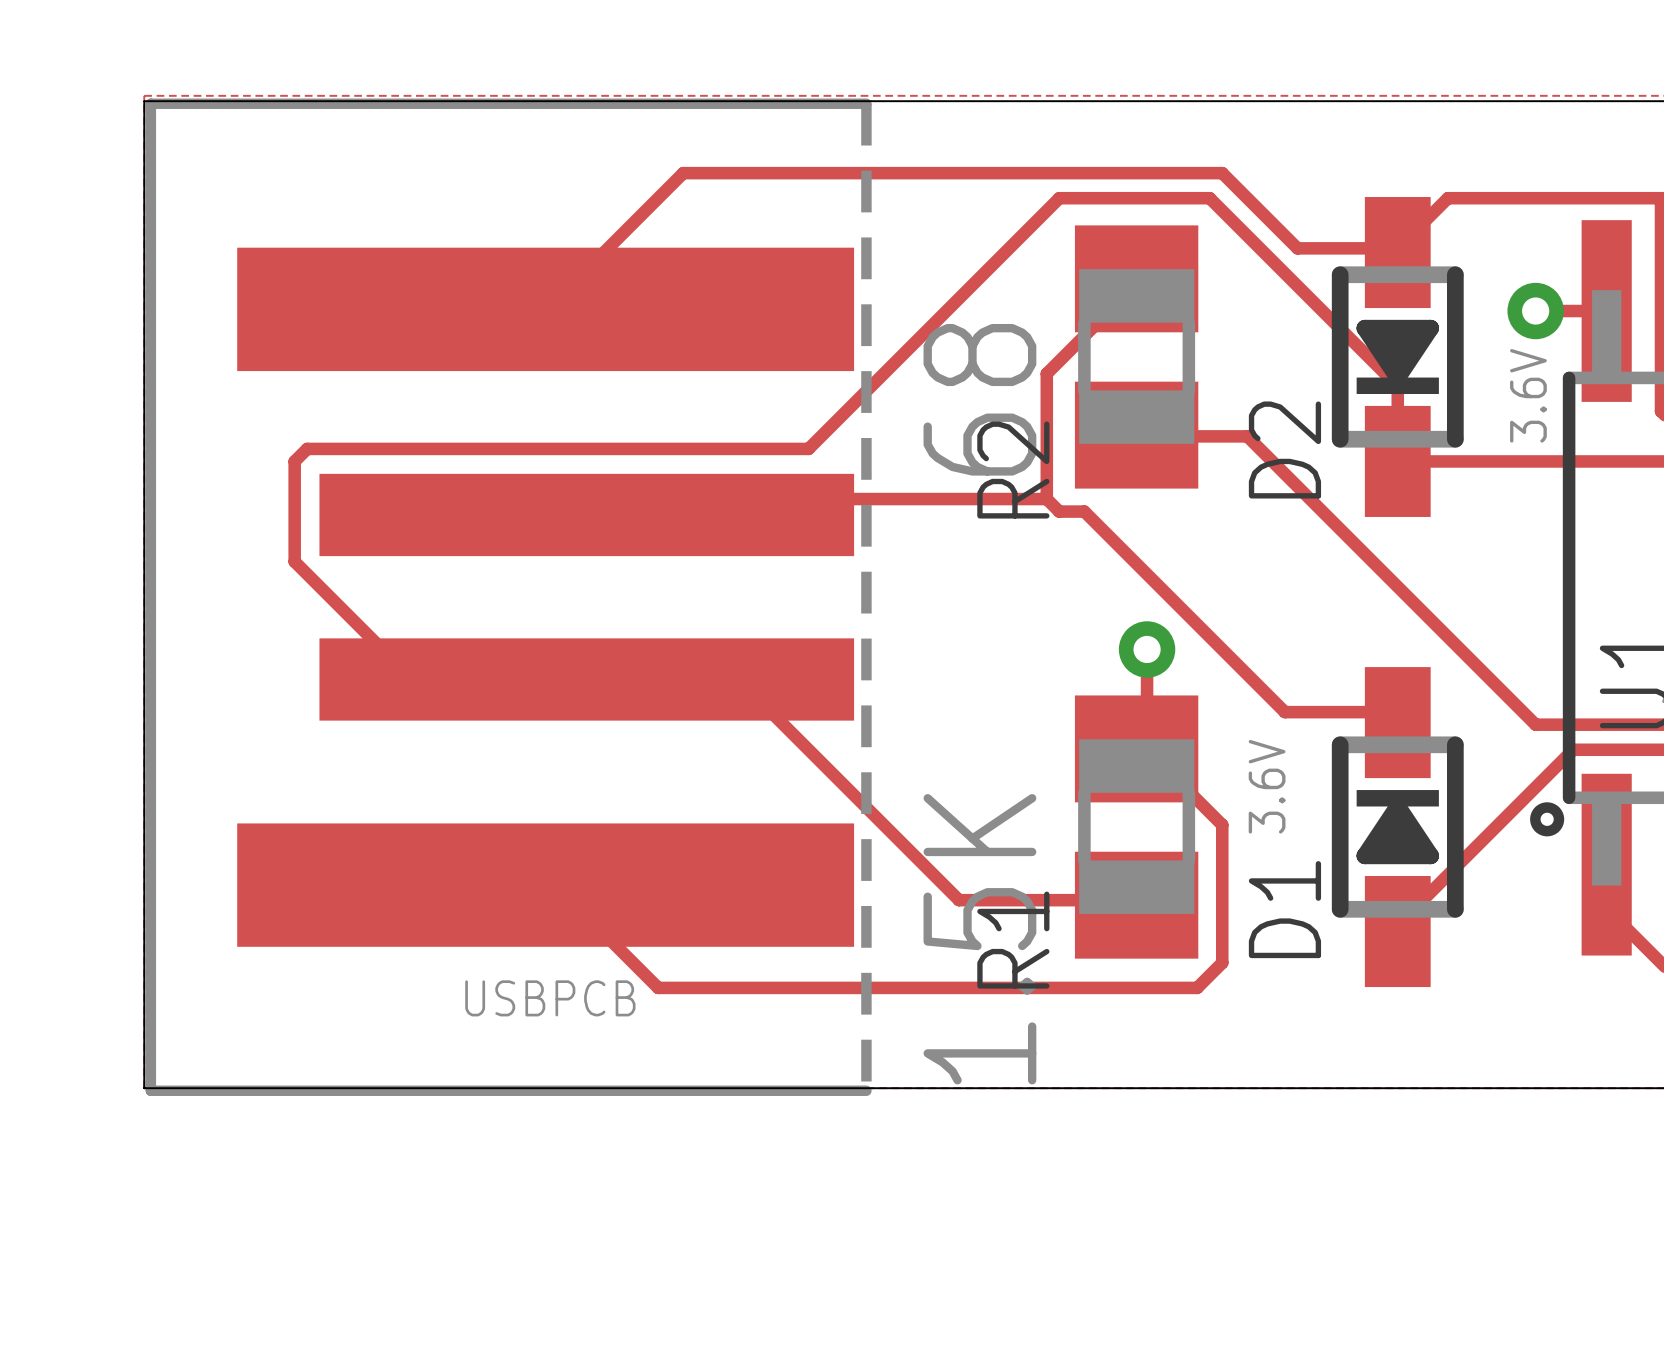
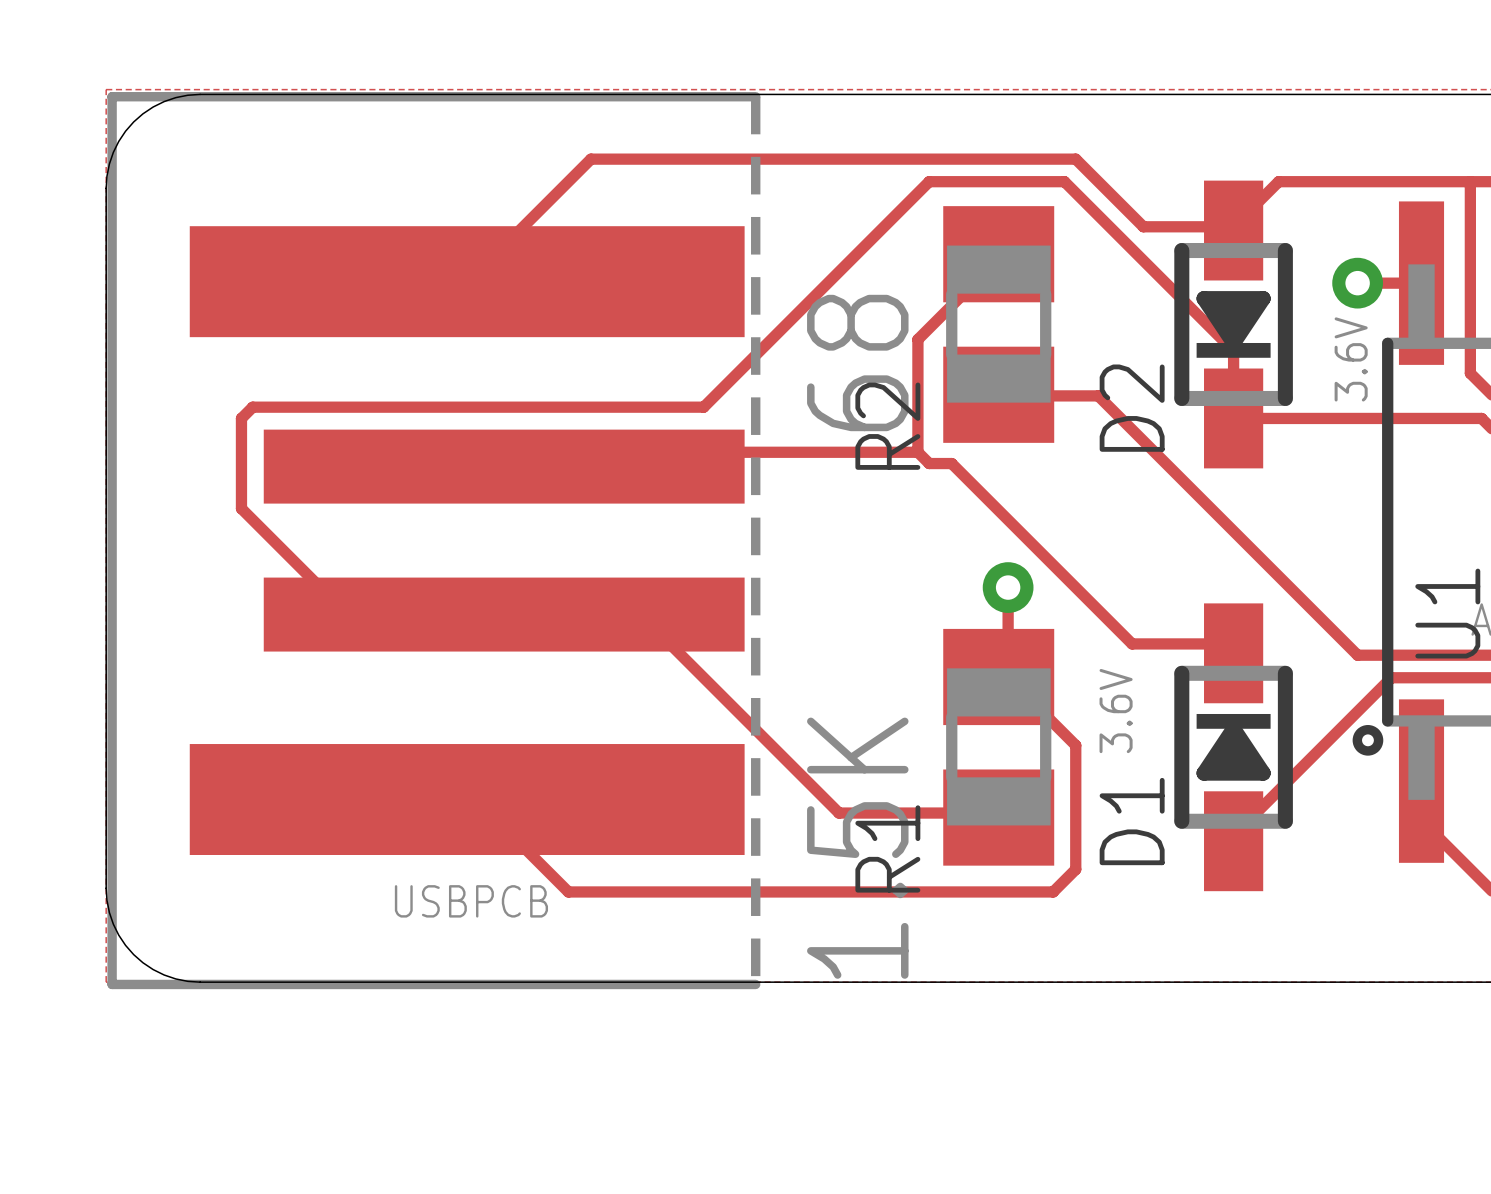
board edge: (248, 101) (144, 101) (144, 205) -> (200, 94) (175, 97) (164, 101) (153, 107) (133, 121) (118, 141) (113, 152) (109, 164) (106, 188)
board edge: (144, 983) (144, 1088) (248, 1088) -> (106, 888) (109, 912) (113, 924) (118, 935) (133, 954) (153, 969) (164, 975) (175, 978) (200, 982)

